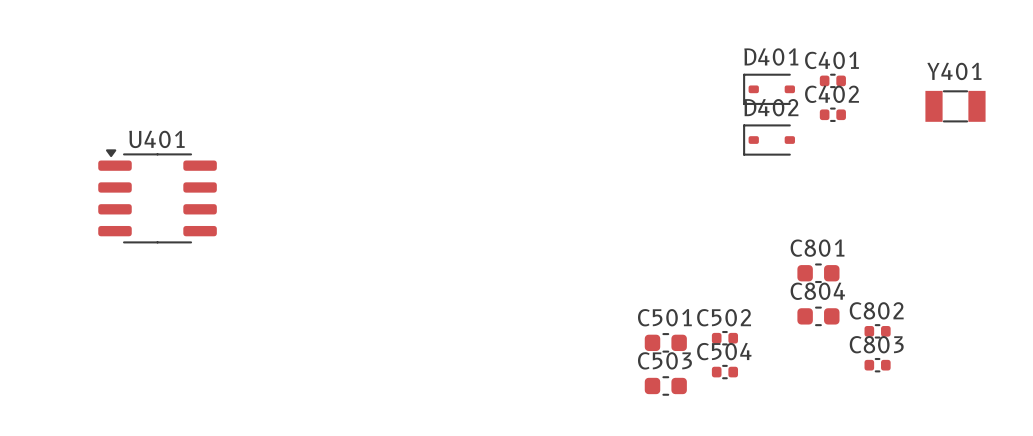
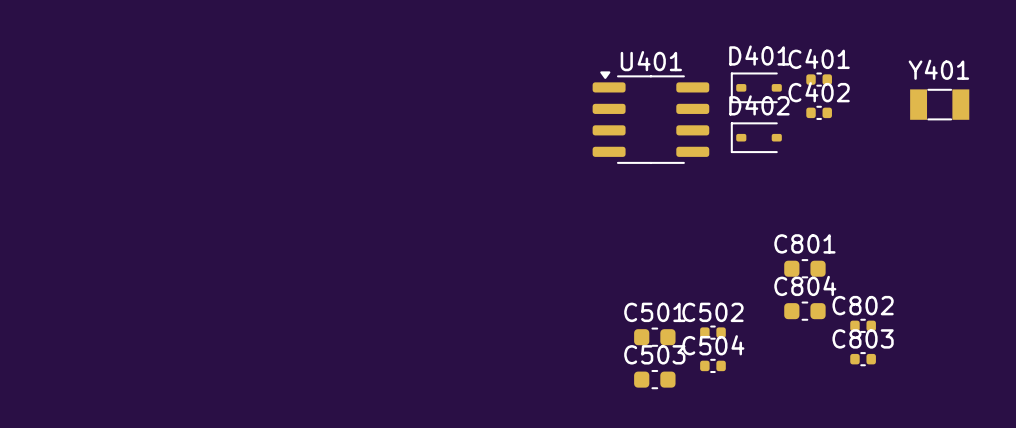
U401 position: (157, 196) -> (650, 117)

